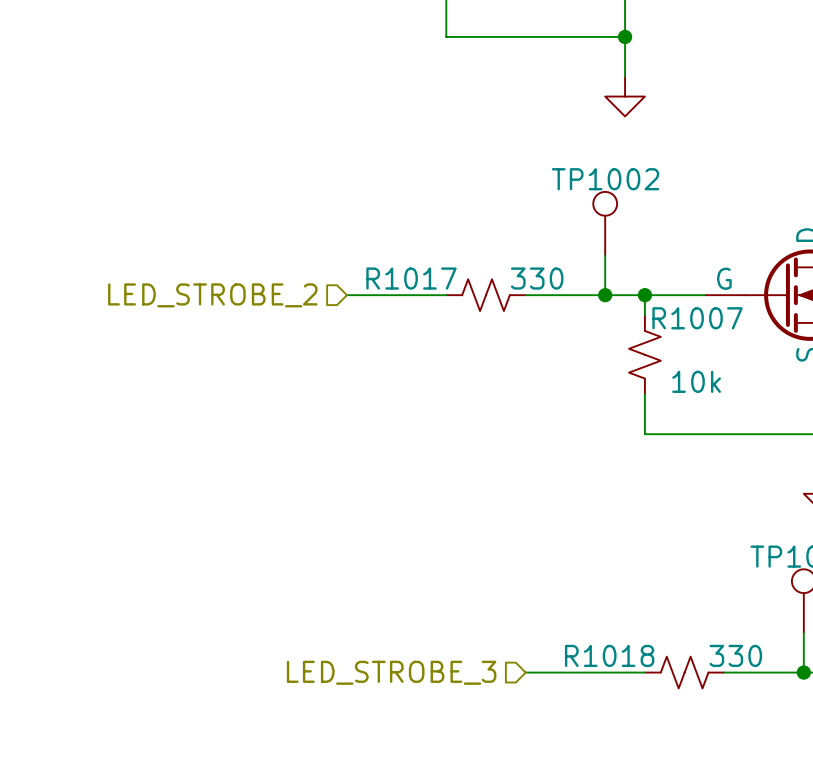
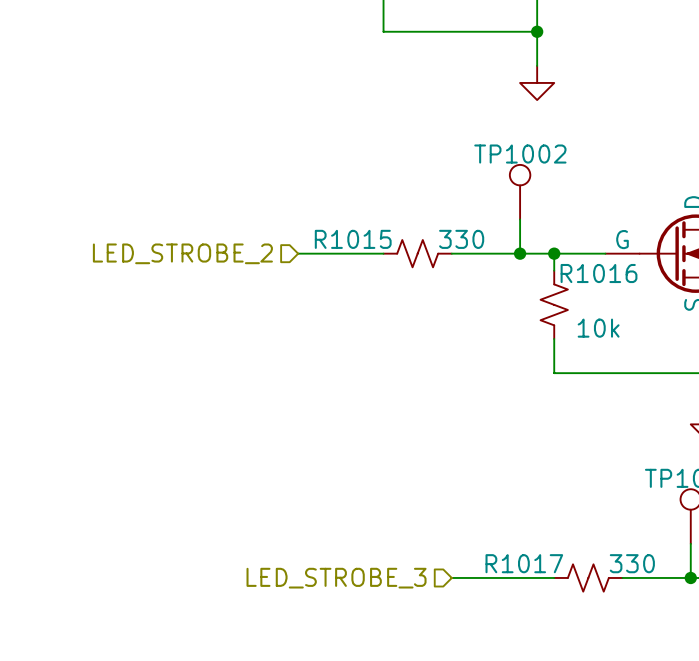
R1017 name: R1017 (411, 278) -> R1015 (353, 239)
R1007 name: R1007 (697, 318) -> R1016 (599, 273)
R1018 name: R1018 (609, 655) -> R1017 (524, 563)

